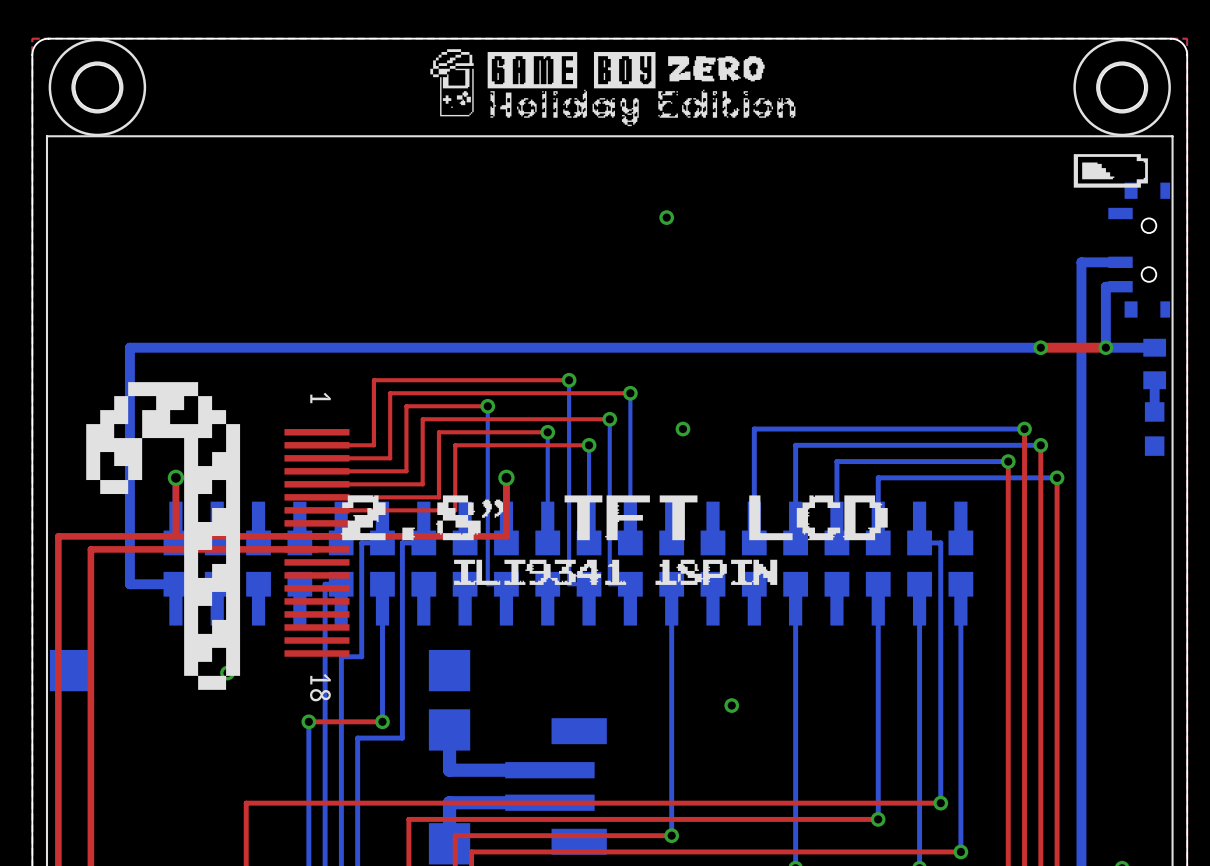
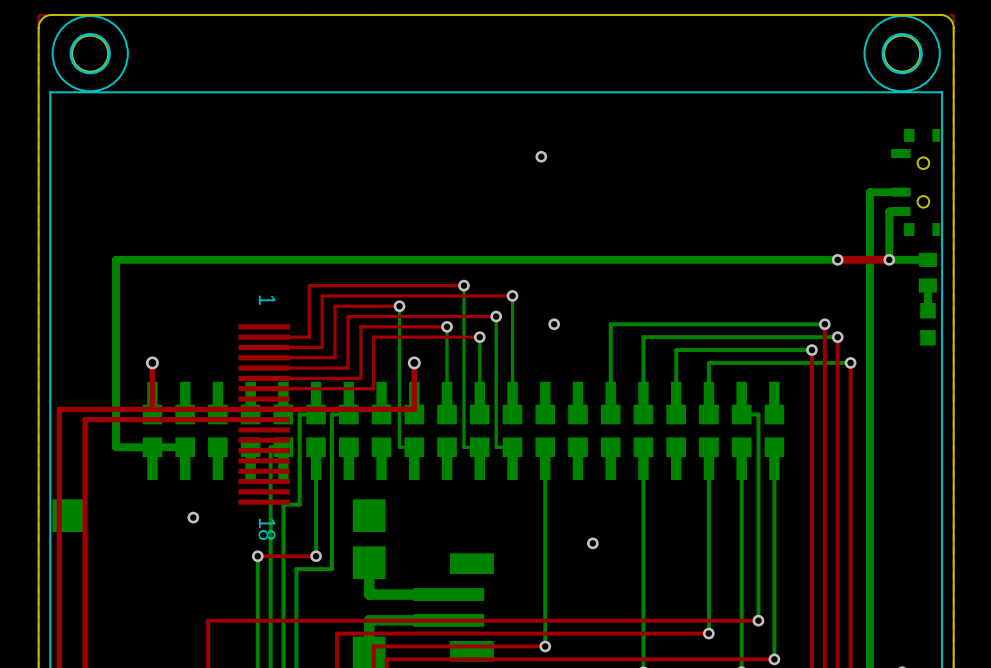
drawing: [430, 49, 796, 127] -> none
drawing: [1073, 154, 1148, 188] -> none
drawing: [86, 382, 241, 690] -> none
drawing: [340, 495, 415, 541] -> none
drawing: [435, 495, 504, 541] -> none
drawing: [564, 495, 698, 541] -> none
drawing: [749, 495, 888, 541] -> none
drawing: [454, 559, 627, 585] -> none
drawing: [655, 559, 778, 585] -> none

